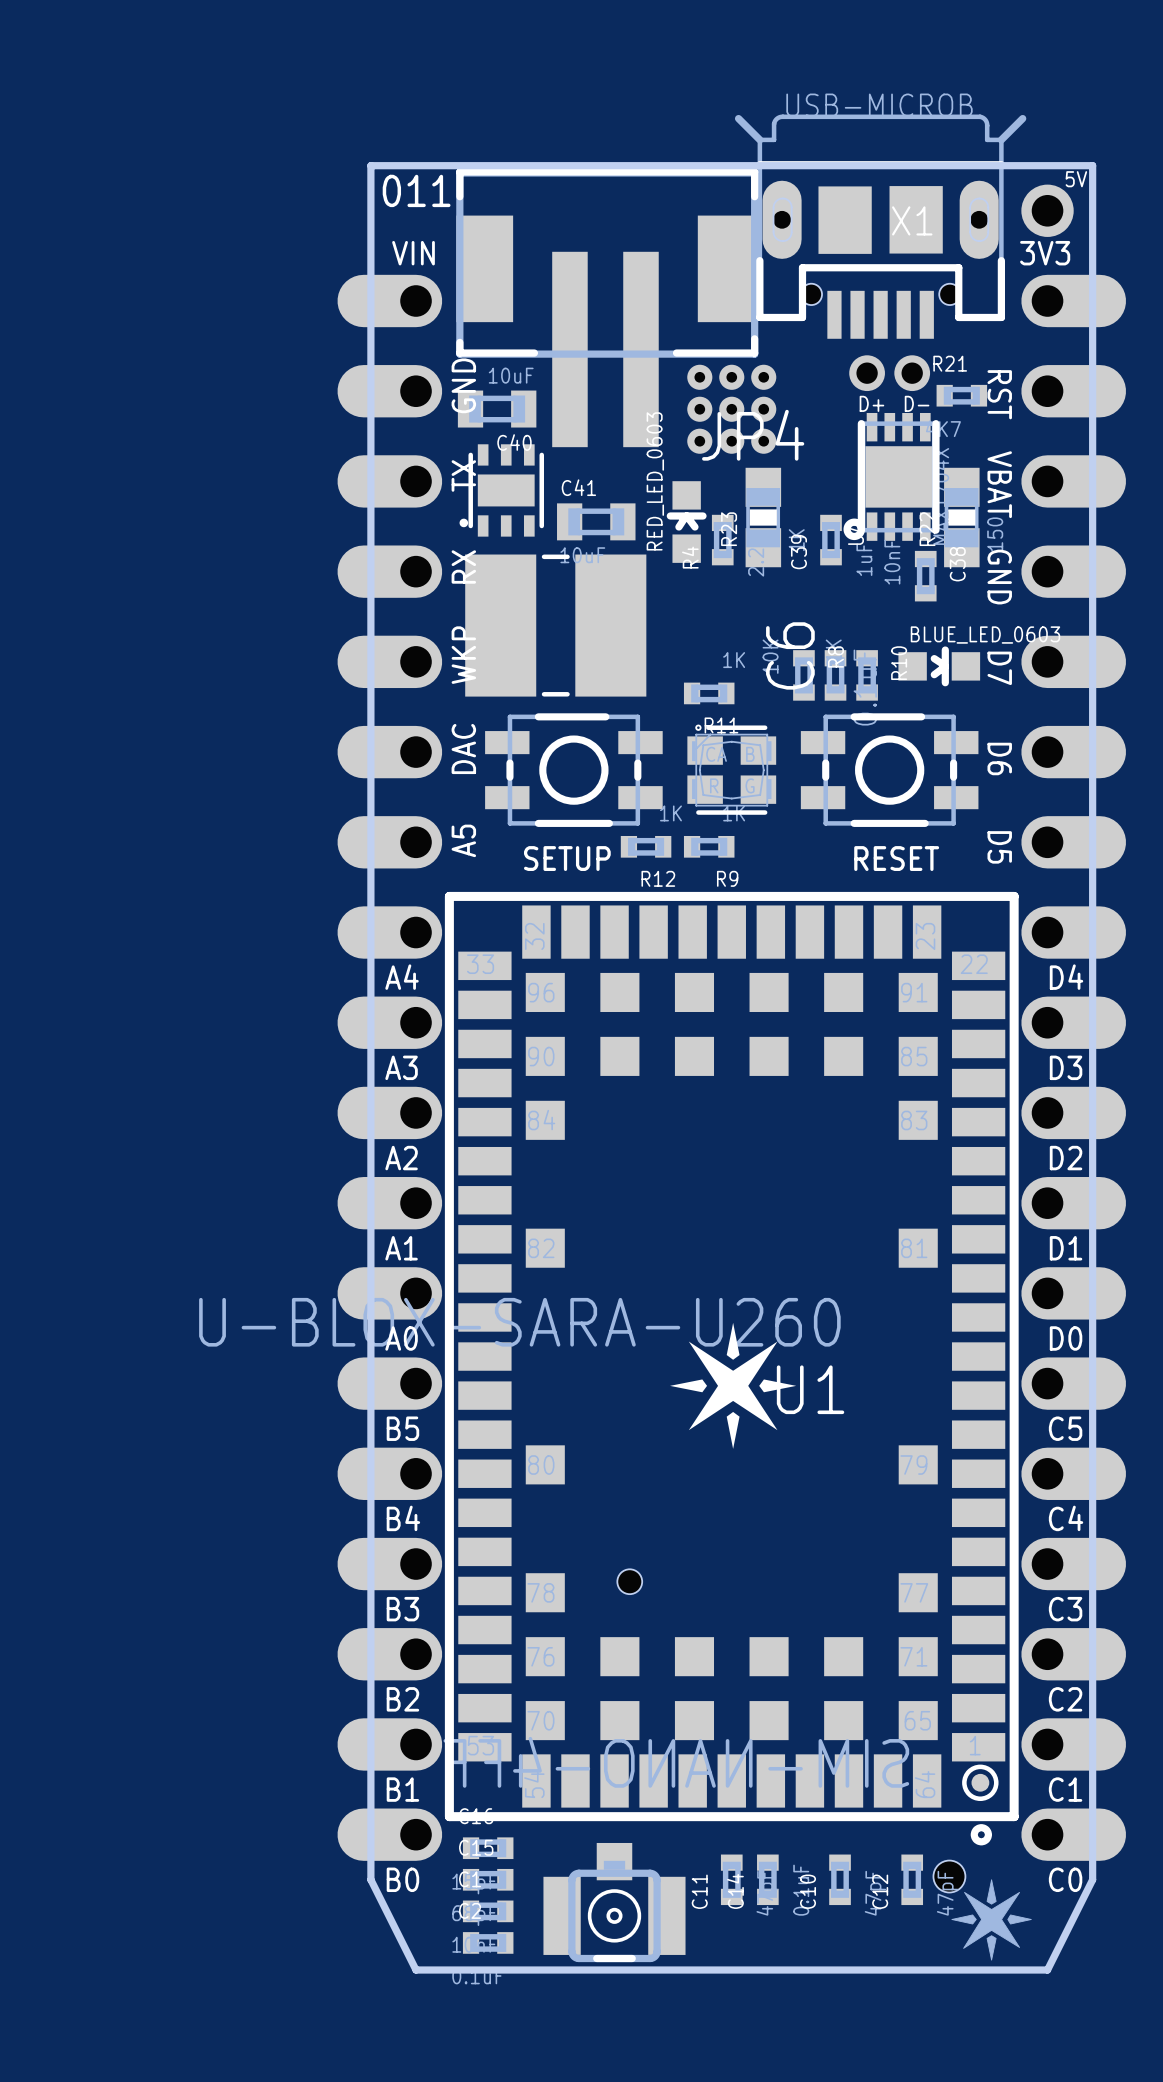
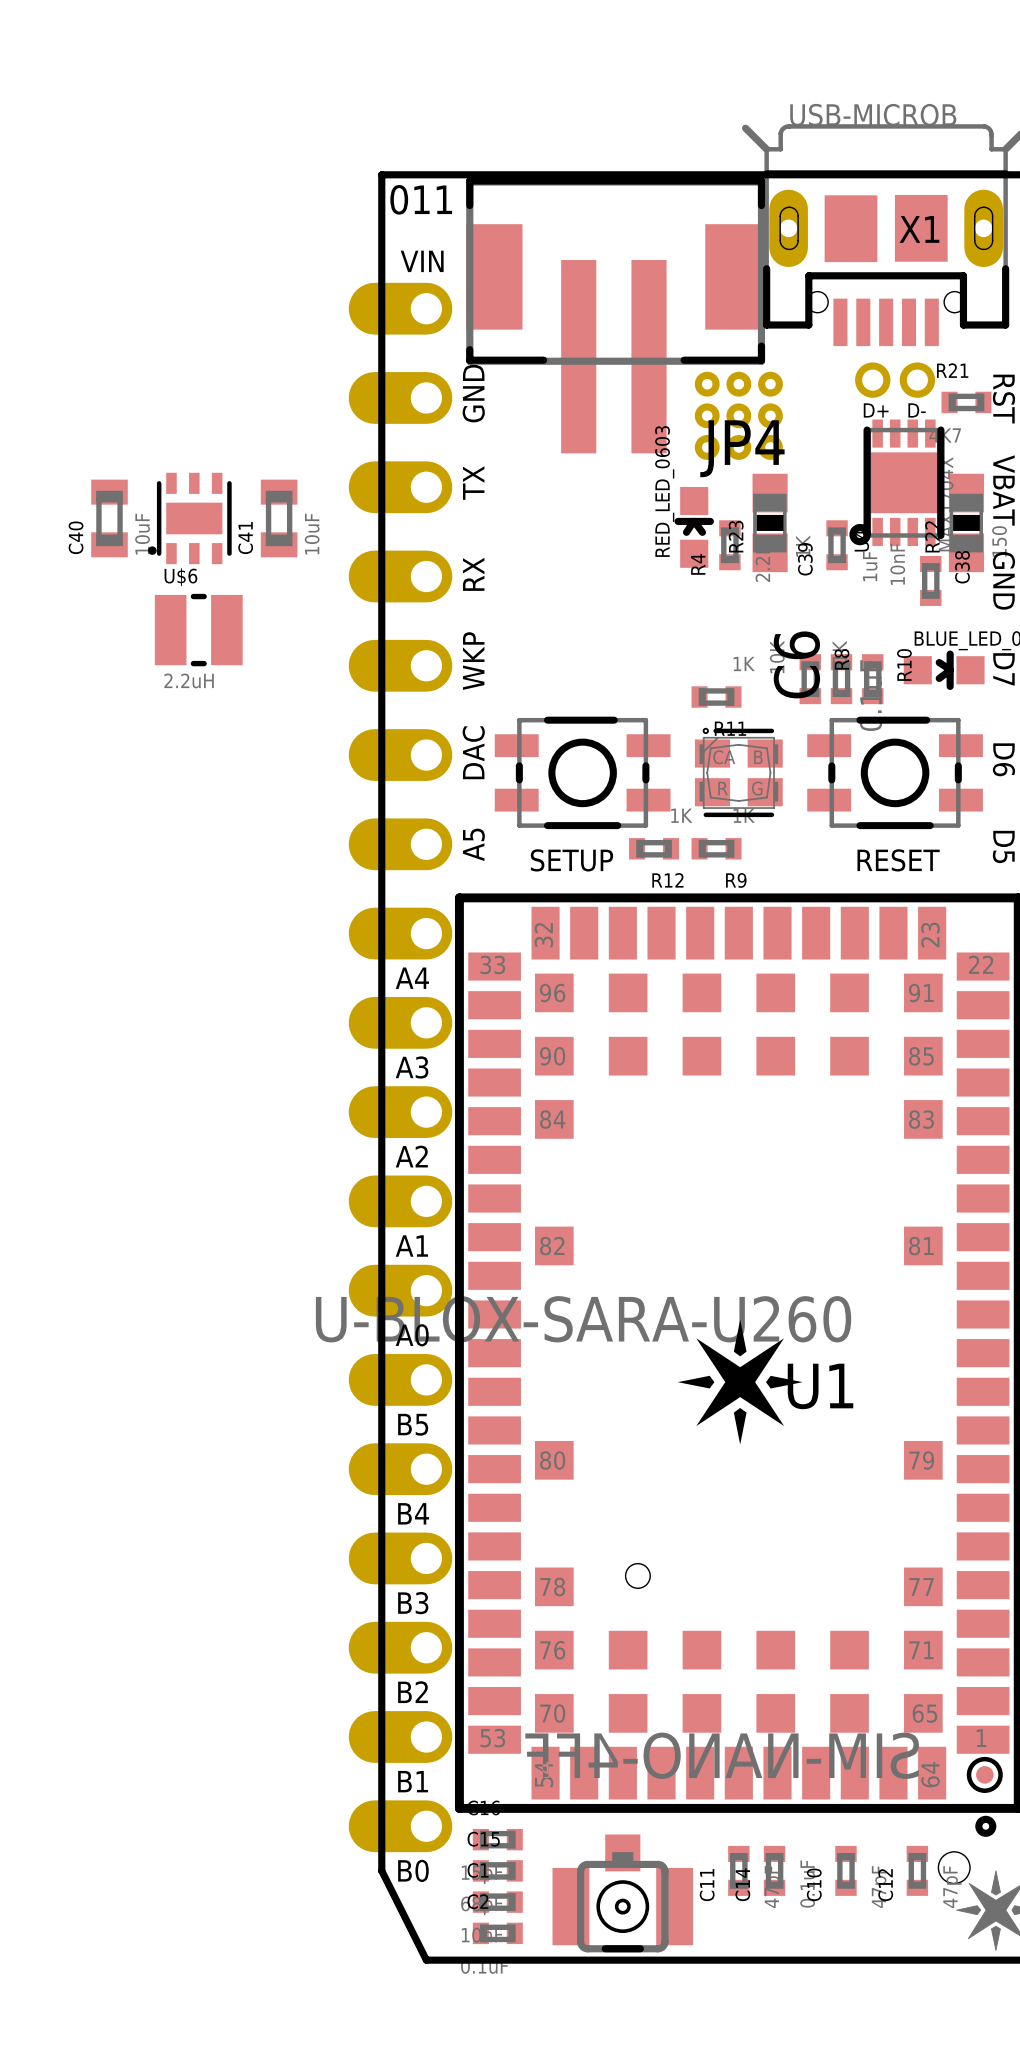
C40 rotation: 0° (497, 409) -> 90° clockwise (109, 518)
C40 position: (497, 409) -> (109, 518)
part position: (501, 490) -> (189, 518)
C41 rotation: 0° (596, 521) -> 90° counterclockwise (279, 518)
C41 position: (596, 521) -> (279, 518)
U$6: none -> 2.2uH (198, 630)
part: (555, 625) -> none

